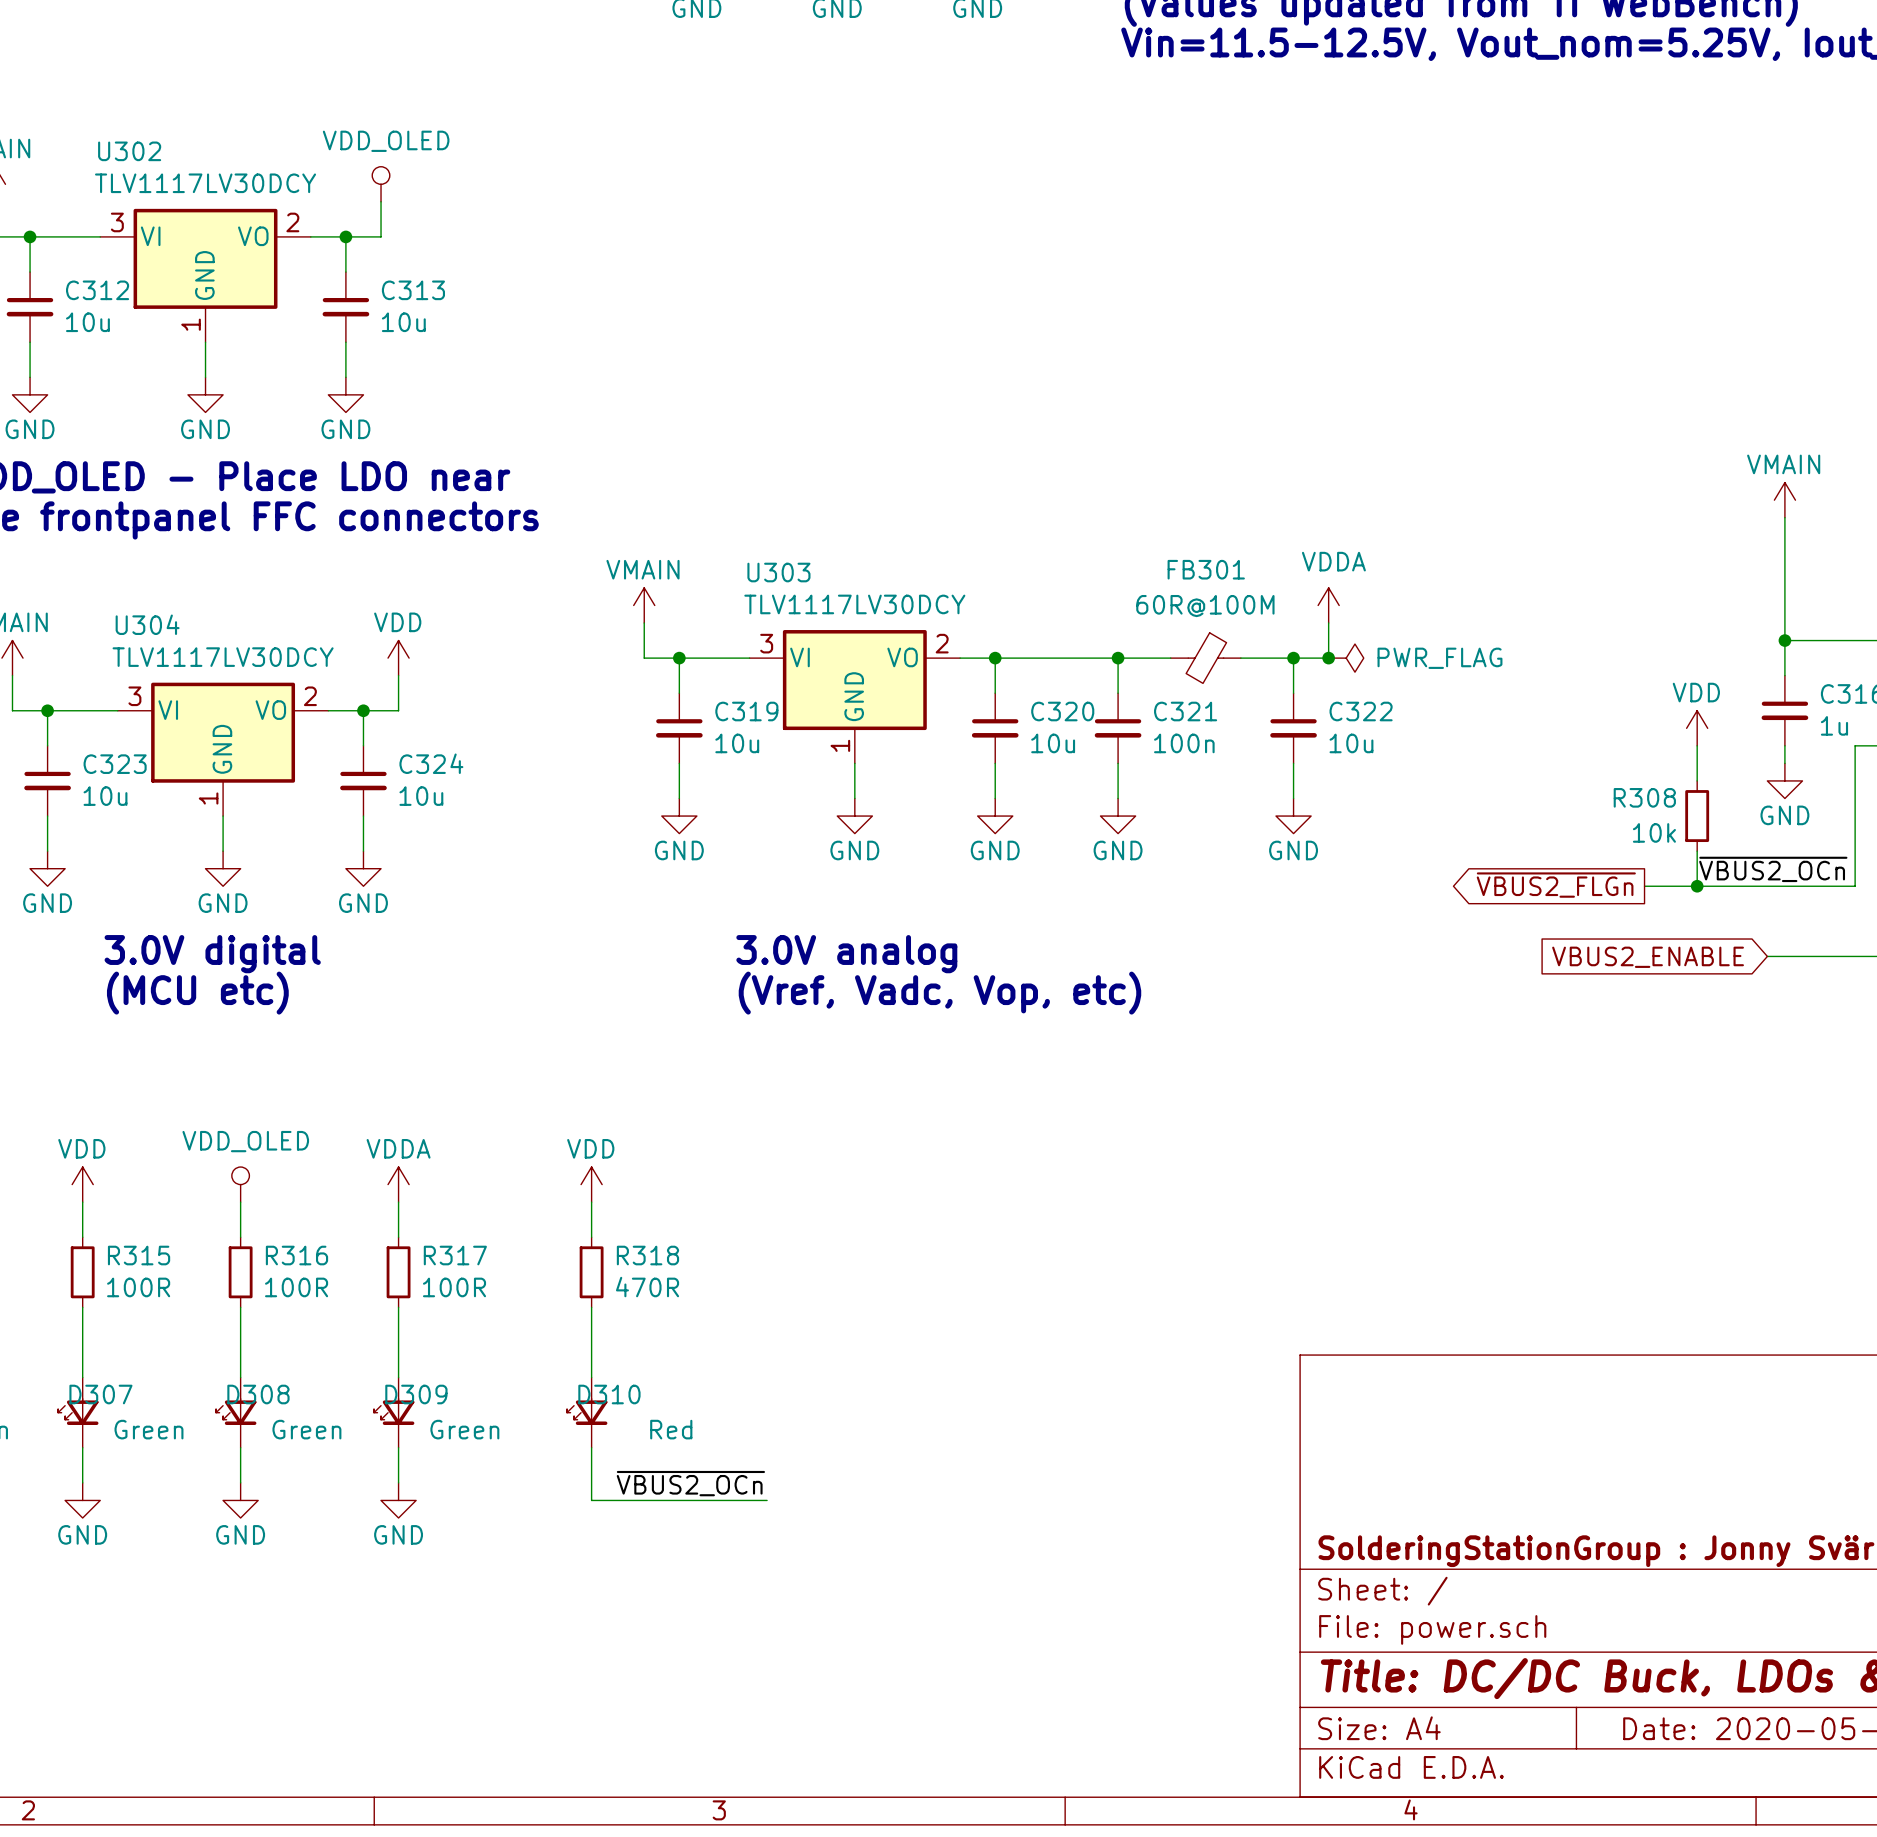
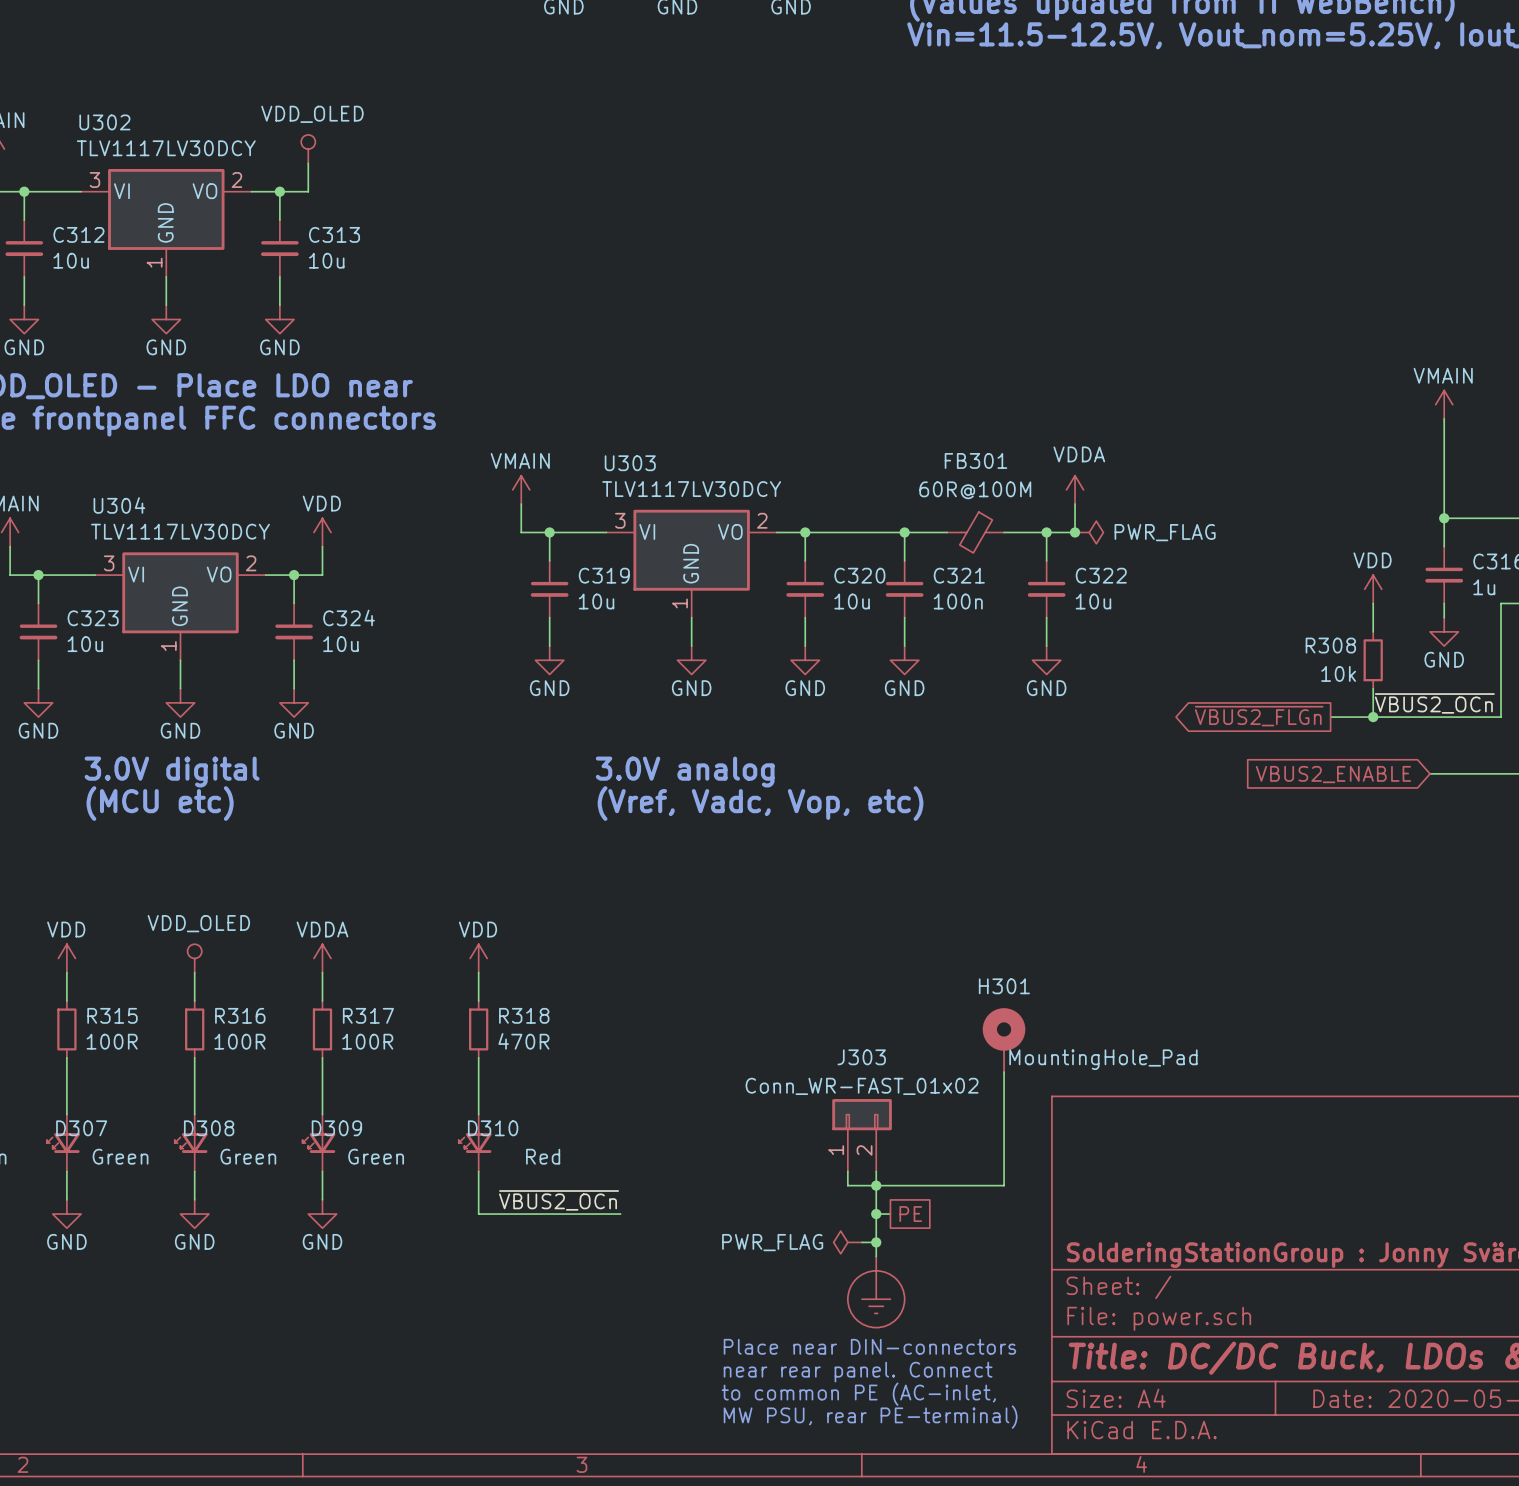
H301: none -> MountingHole_Pad (1004, 1040)
wire: none -> (1004, 1072) (1004, 1185) (847, 1185) (847, 1171)
J303: none -> Conn_WR-FAST_01x02 (862, 1135)
wire: none -> (876, 1171) (876, 1256)
junction: none -> (876, 1185)
wire: none -> (876, 1214) (890, 1214)
junction: none -> (876, 1214)
global label: none -> PE (910, 1214)
power symbol: none -> PWR_FLAG (847, 1242)
wire: none -> (862, 1242) (876, 1242)
junction: none -> (876, 1242)
power symbol: none -> (876, 1292)
text: none -> Place near DIN-connectors (869, 1346)
text: none -> near rear panel. Connect (858, 1372)
text: none -> to common PE (AC-inlet, (858, 1394)
text: none -> MW PSU, rear PE-terminal) (870, 1417)

